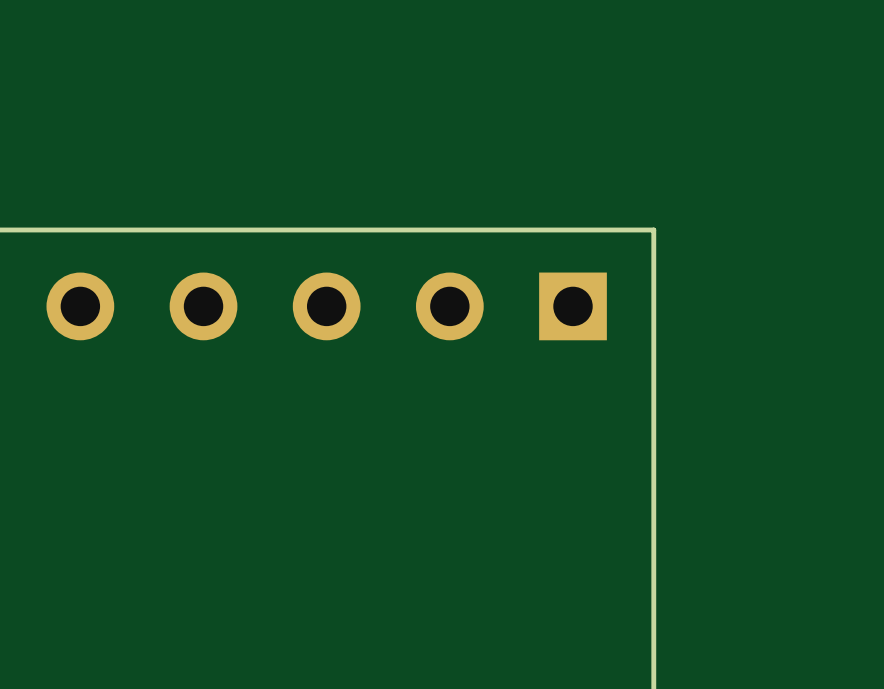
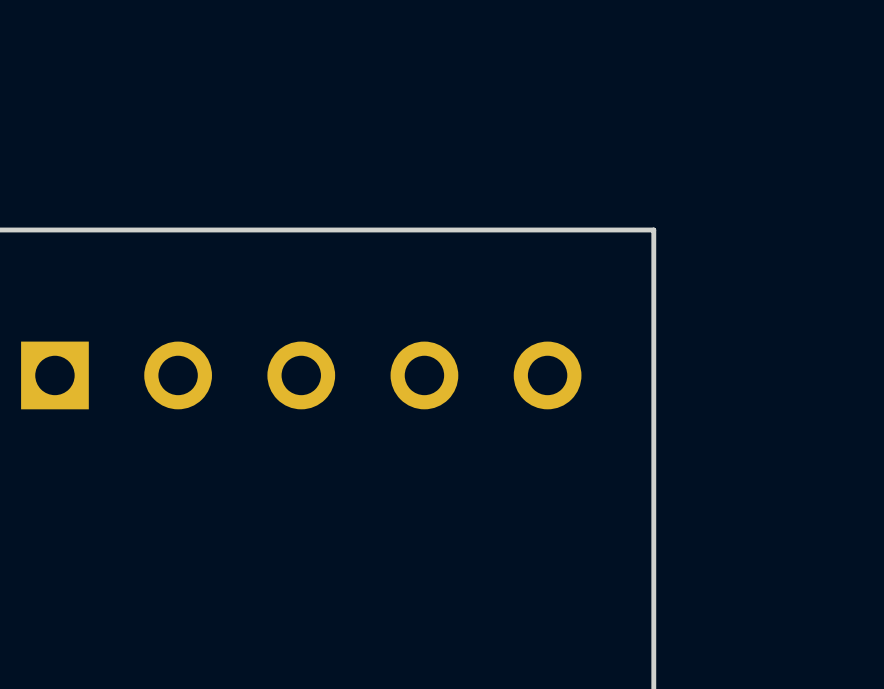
part rotation: 0° (326, 306) -> 180° (301, 375)

